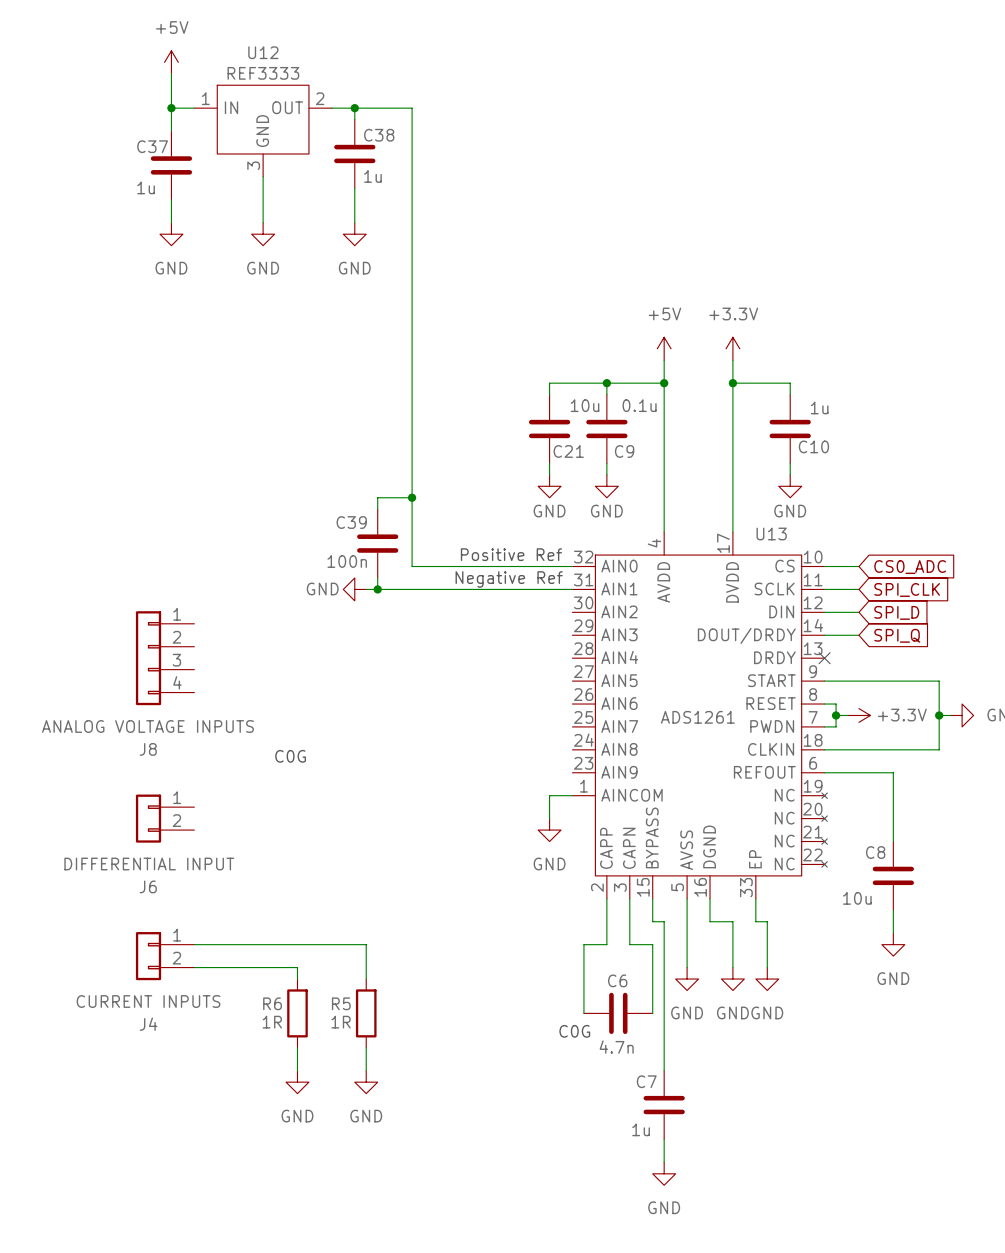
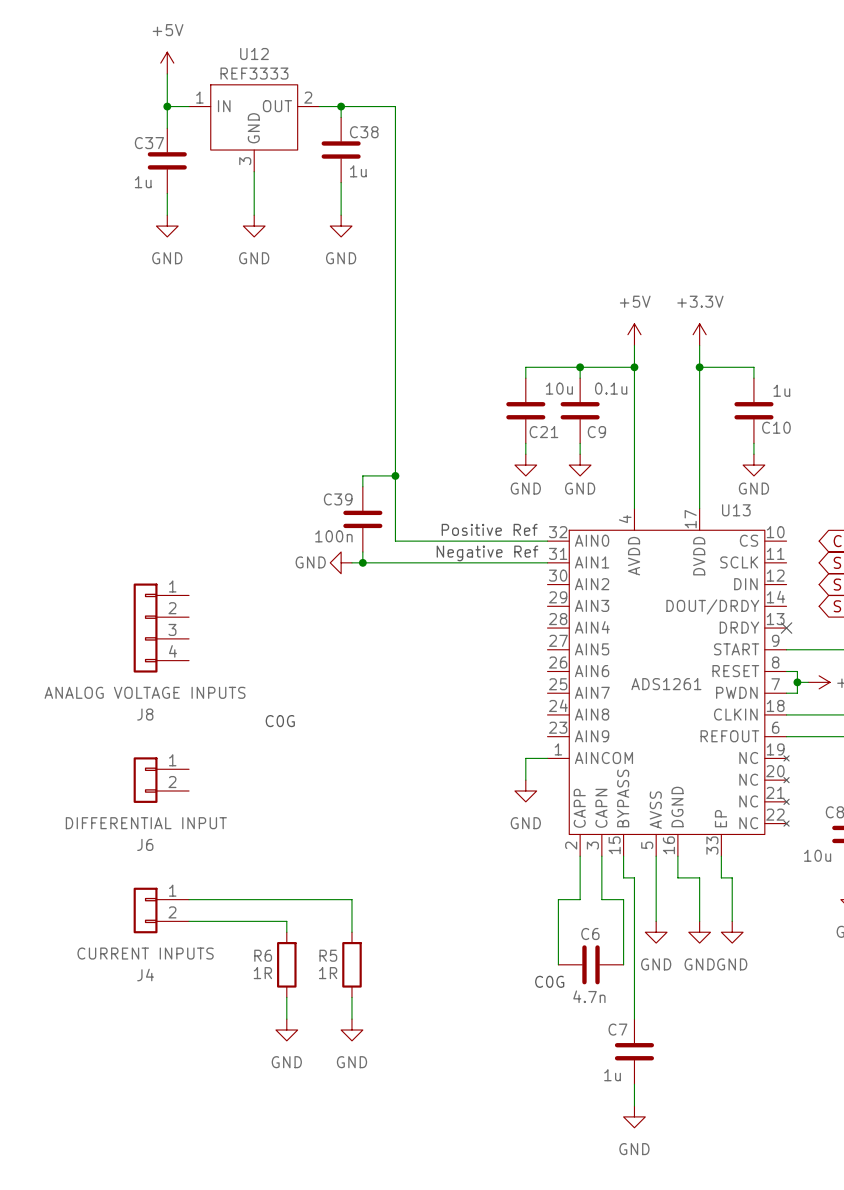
wire: (824, 566) (858, 566) -> none
wire: (824, 589) (858, 589) -> none
wire: (824, 612) (858, 612) -> none
wire: (824, 635) (858, 635) -> none

